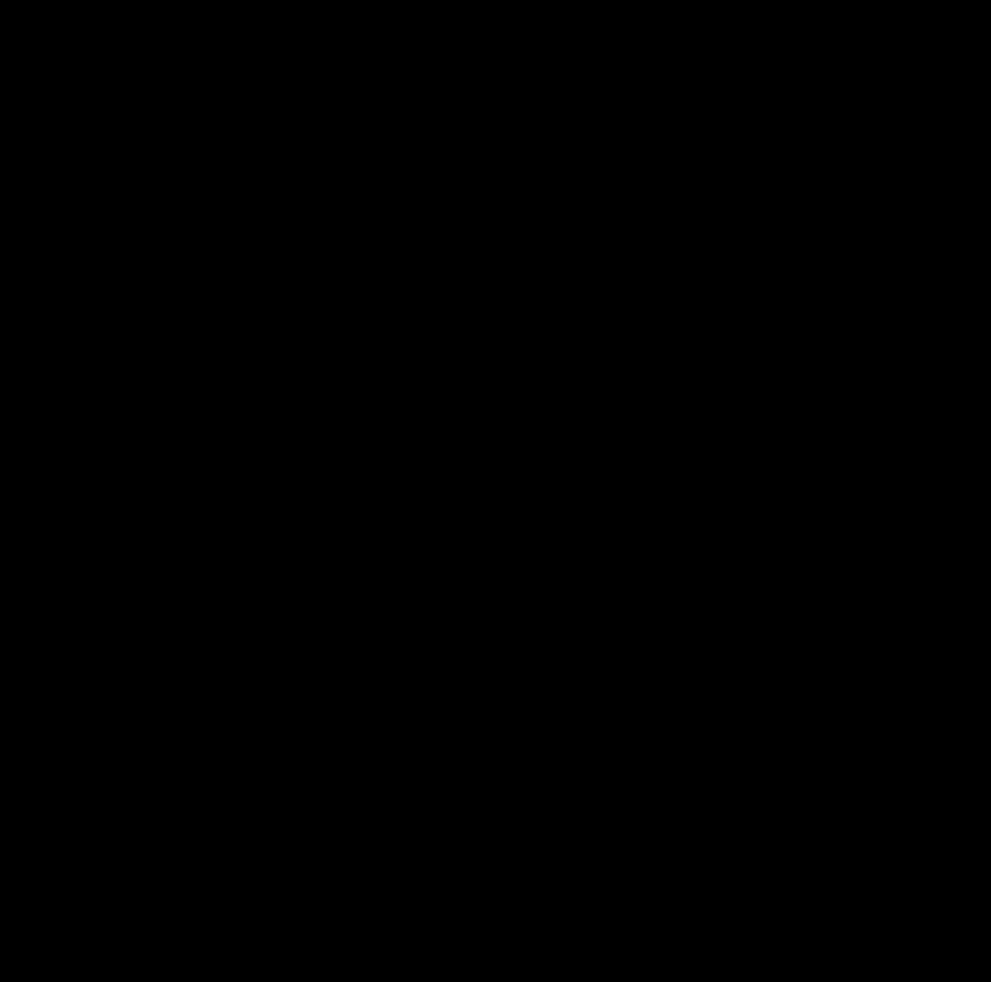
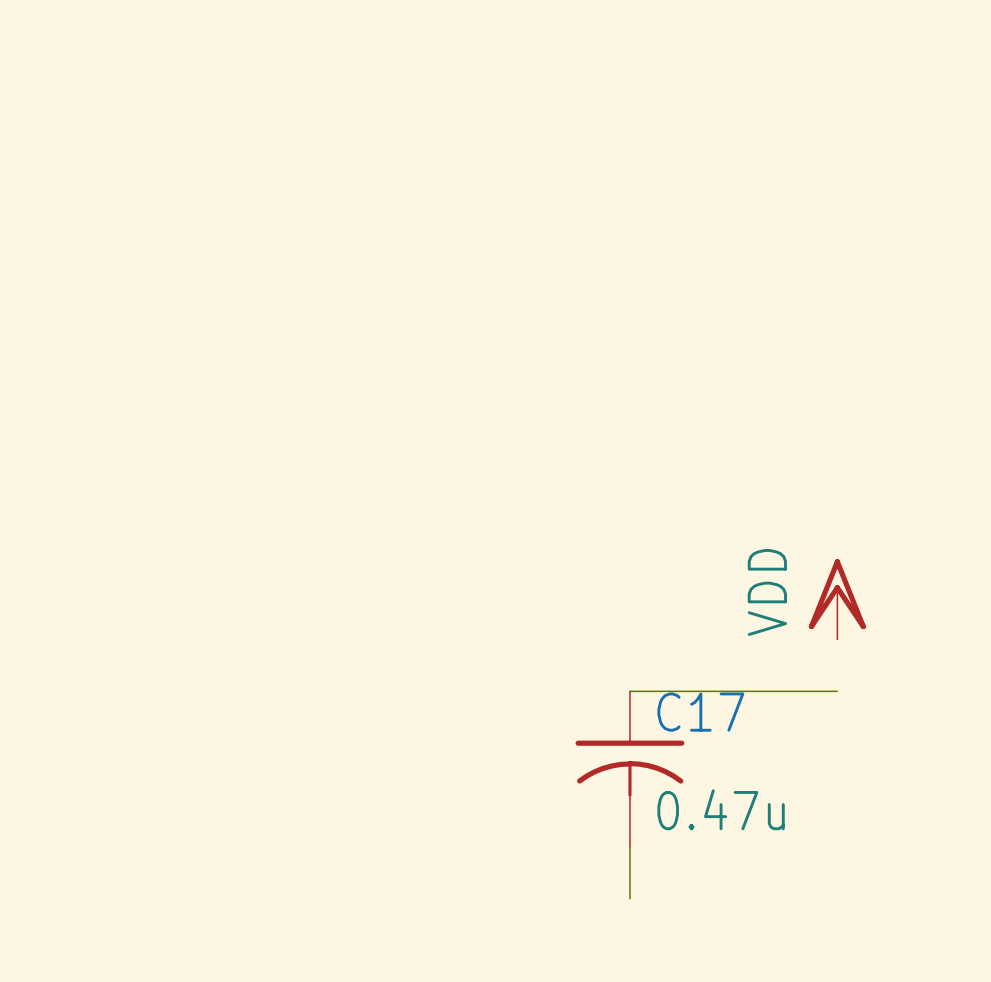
power symbol: none -> VDD (837, 599)
wire: none -> (629, 691) (837, 691)
C17: none -> 0.47u (629, 769)
wire: none -> (629, 846) (629, 898)

